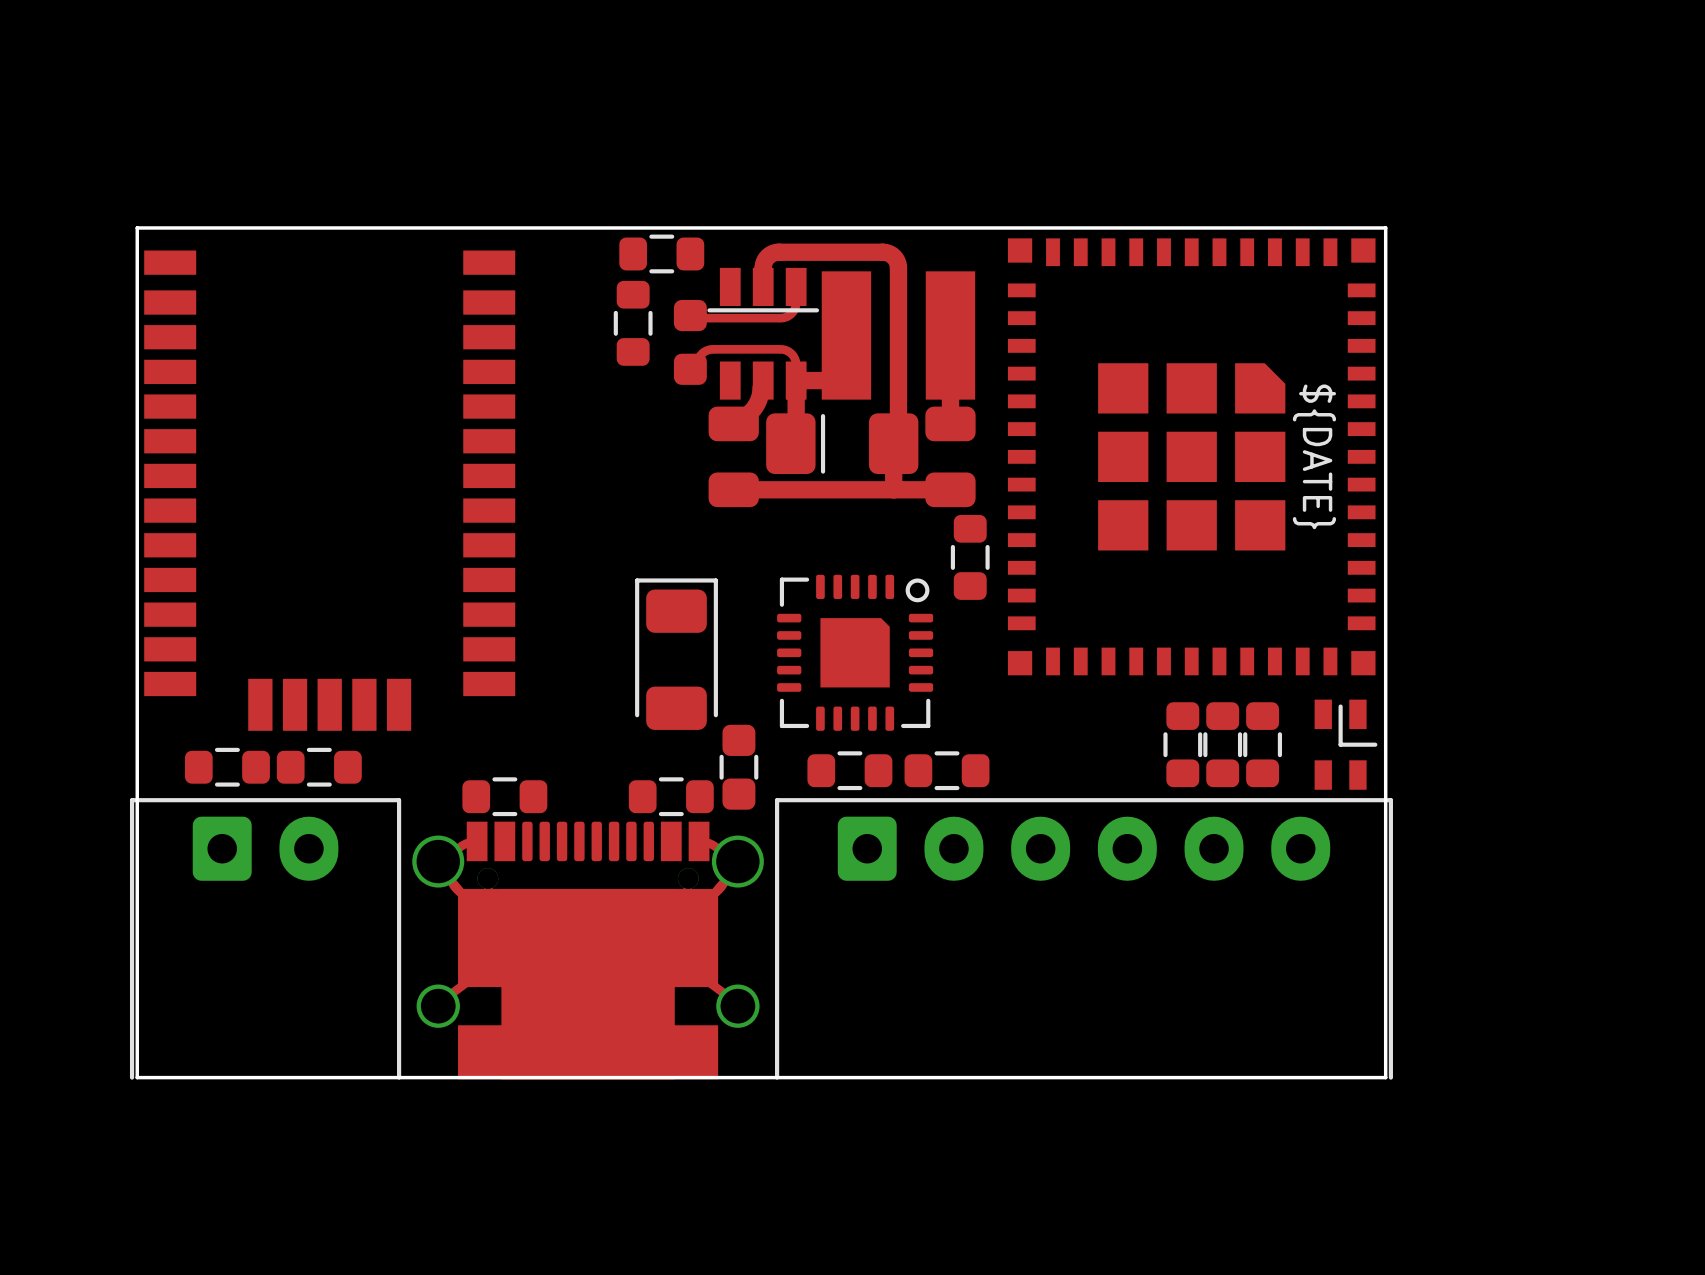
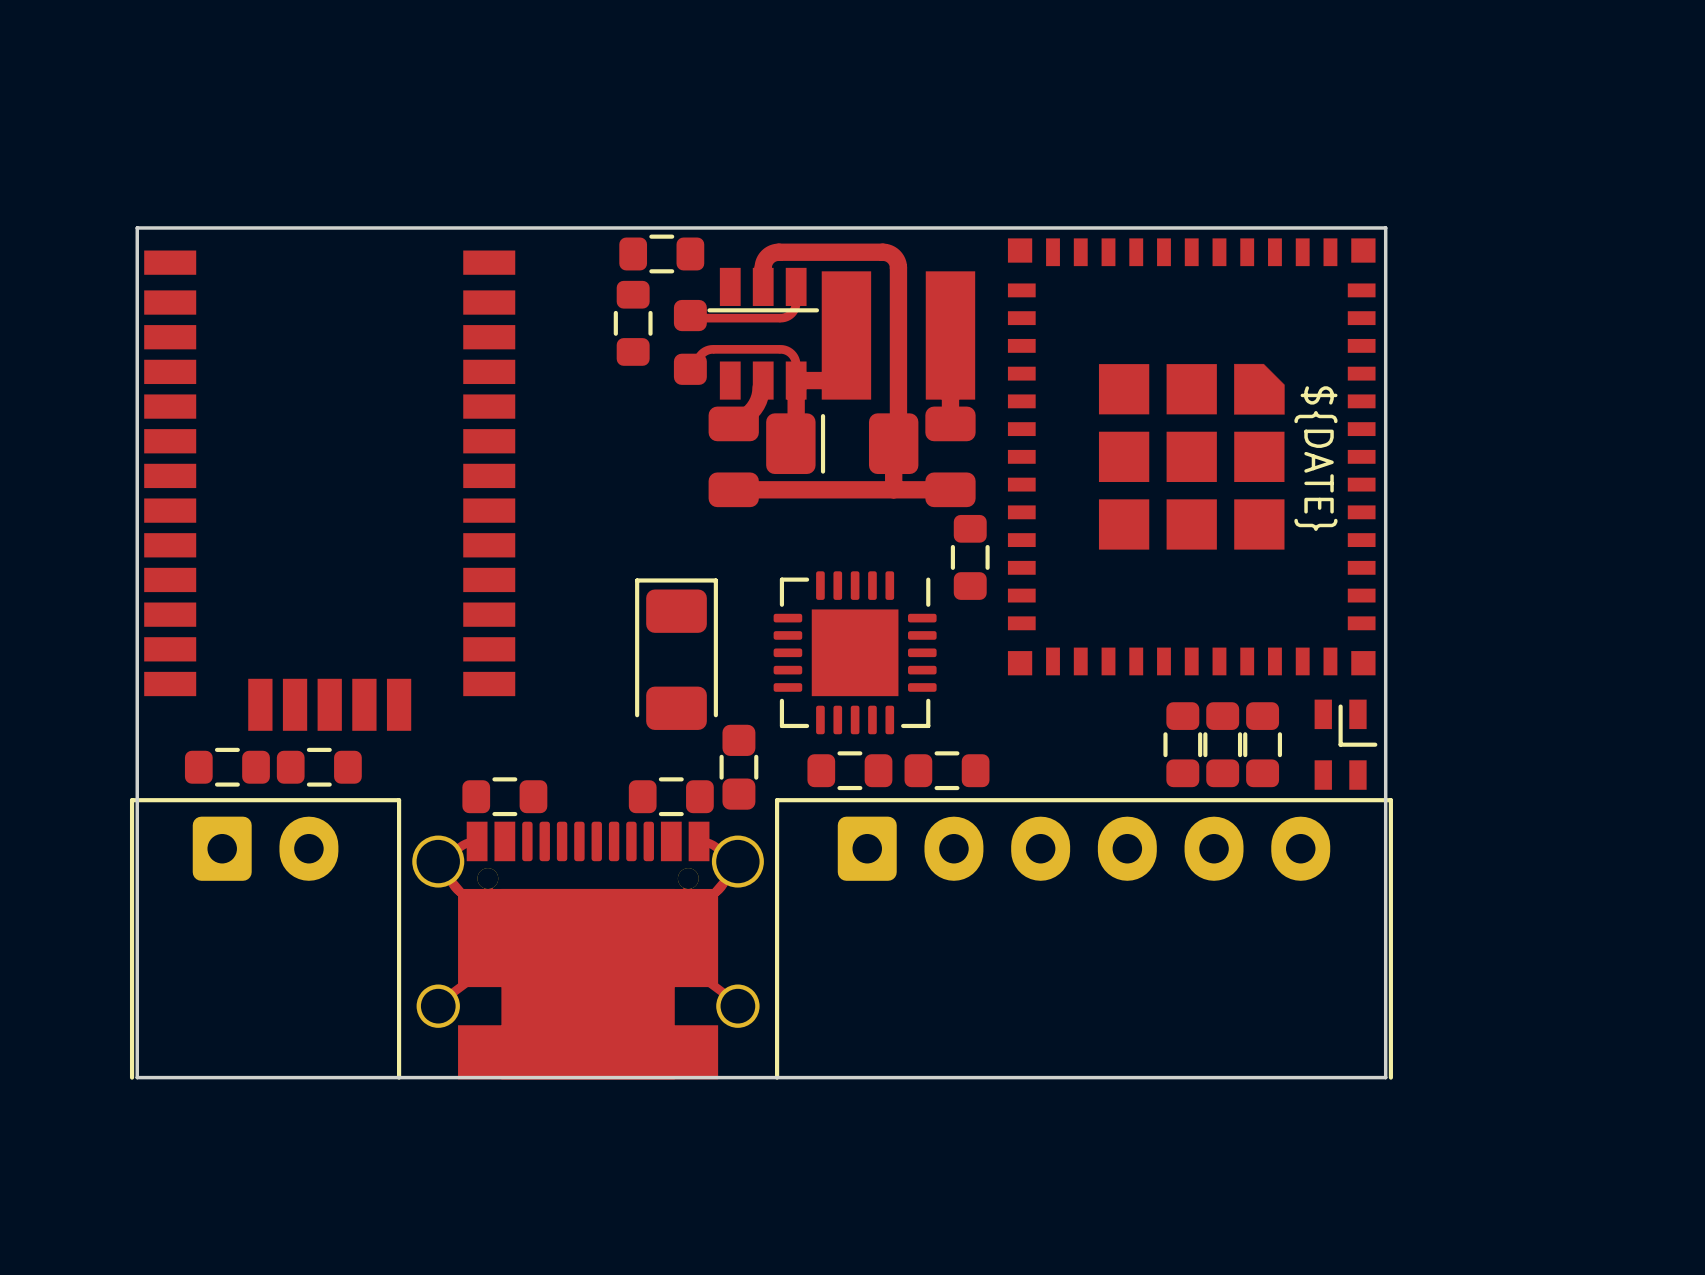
part footprint: [1007, 238, 1376, 676] -> [1007, 238, 1376, 676]
text: none -> ${DATE} (1315, 458)
part footprint: [777, 574, 934, 731] -> [773, 571, 937, 735]

